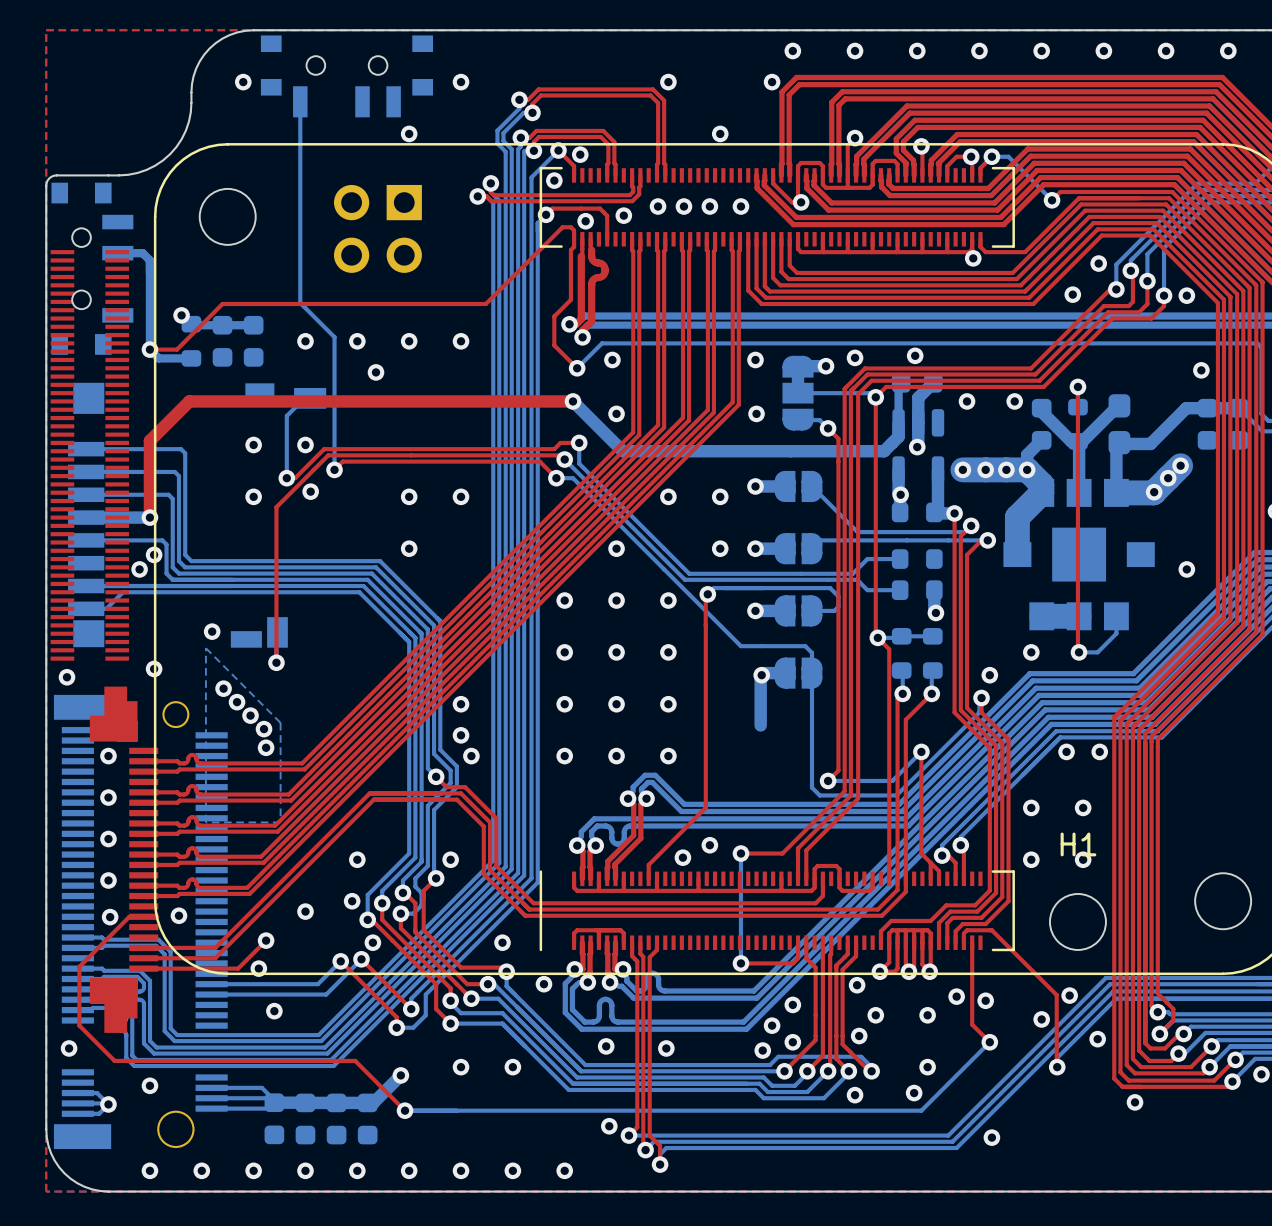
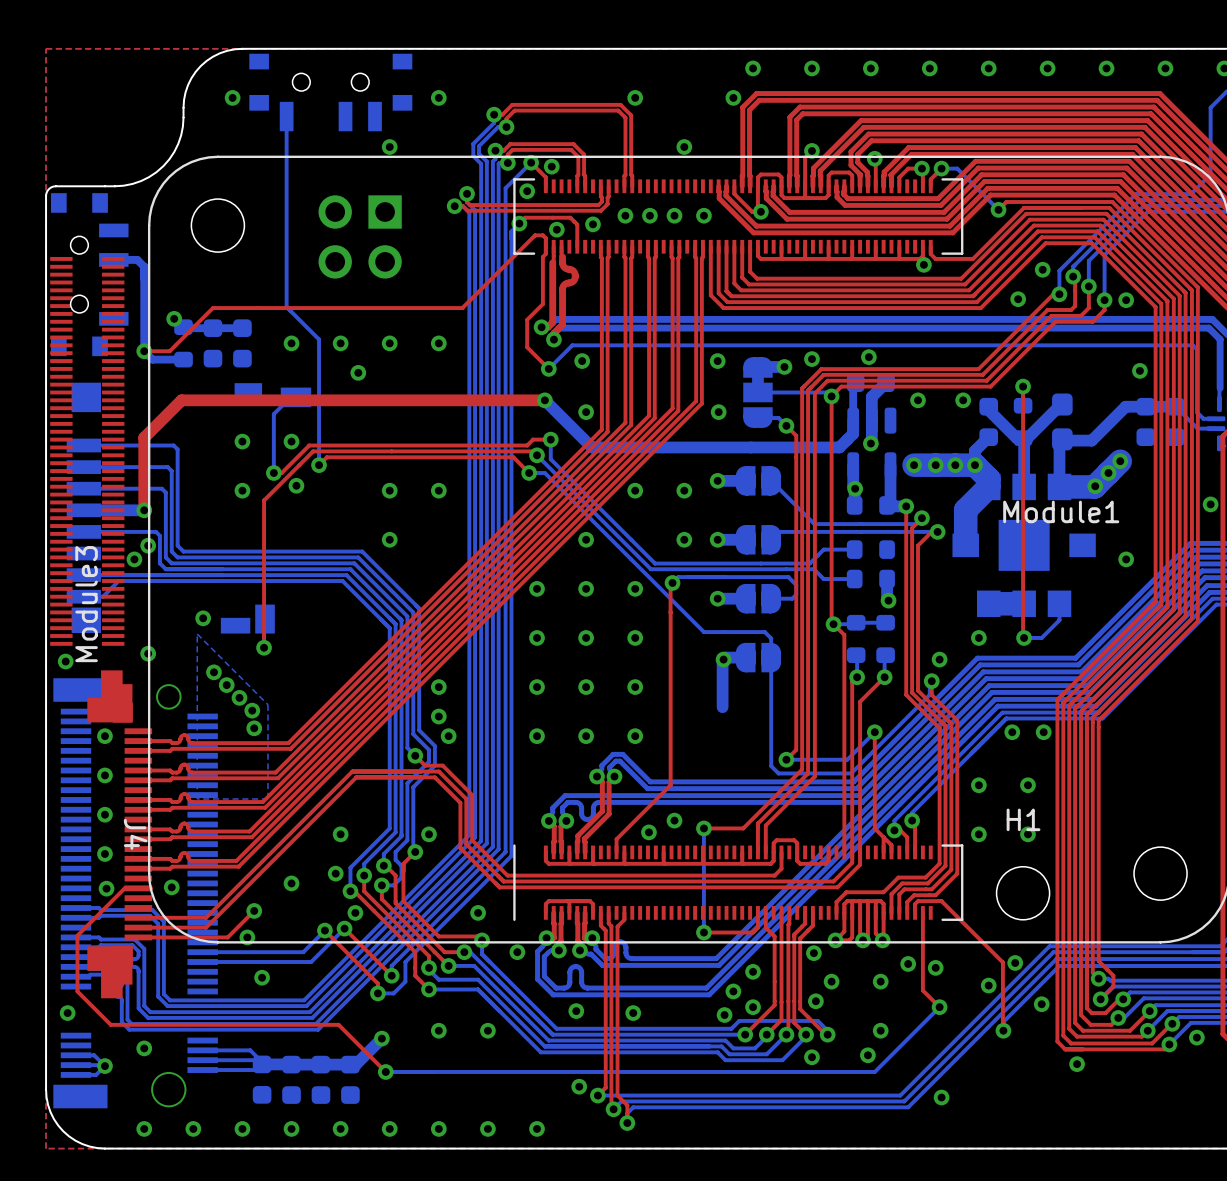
Module1 name: none -> Module1 (1061, 511)
Module3 name: none -> Module3 (86, 604)
J4 name: none -> J4 (135, 834)

